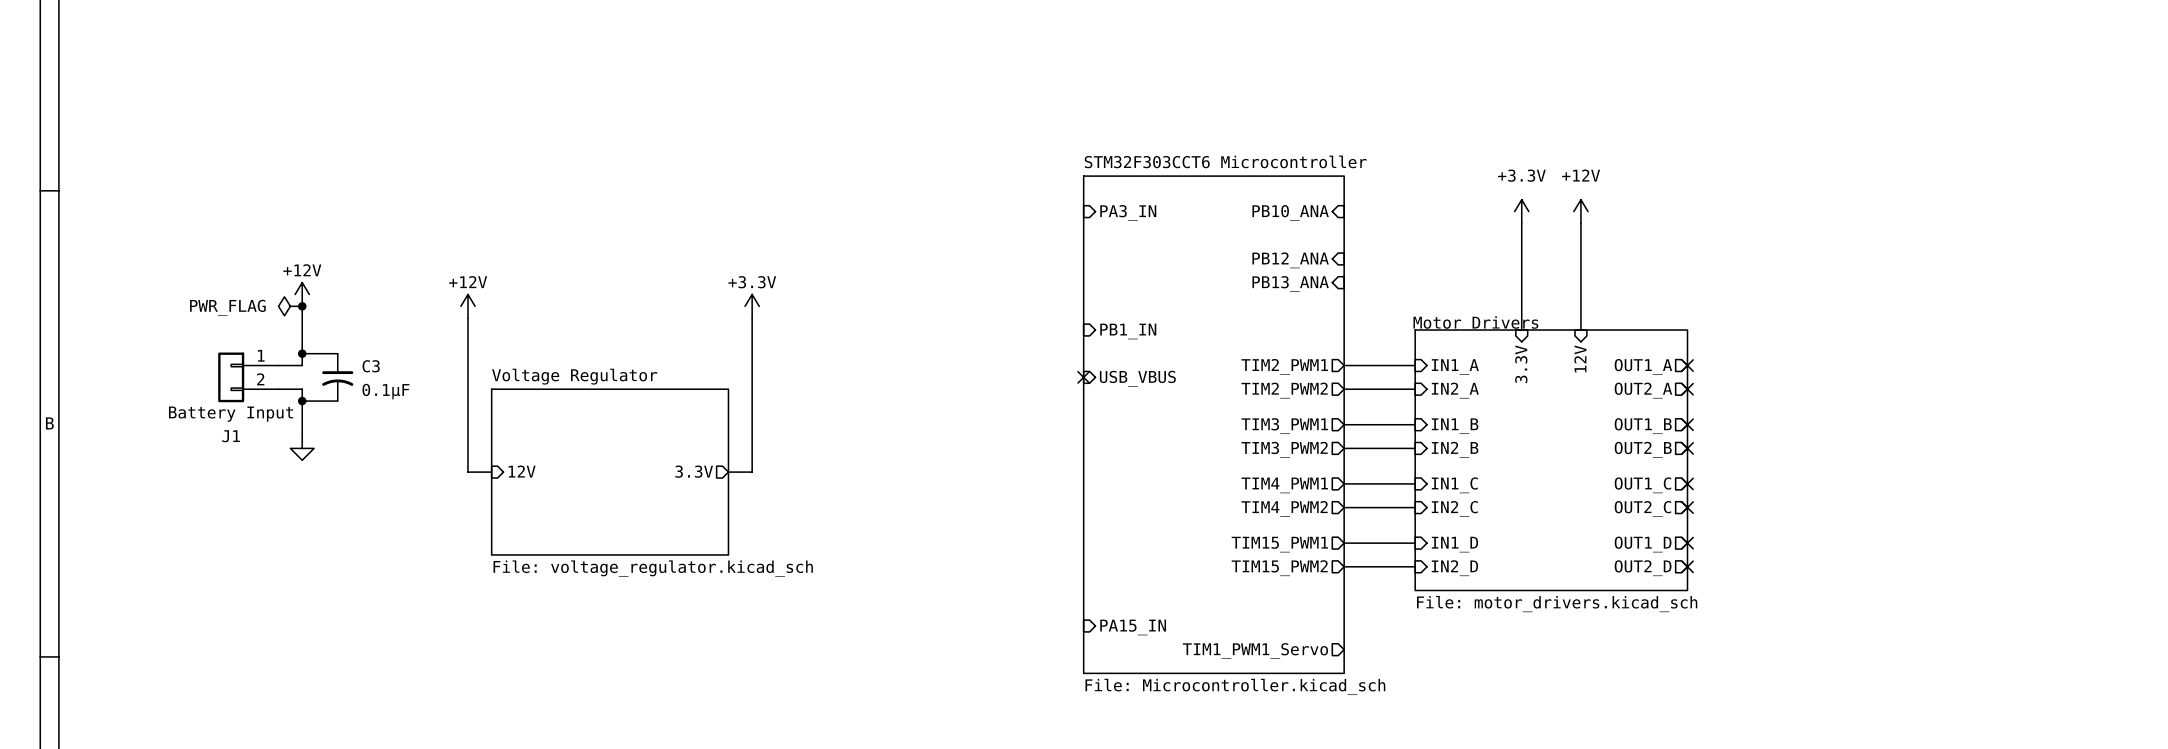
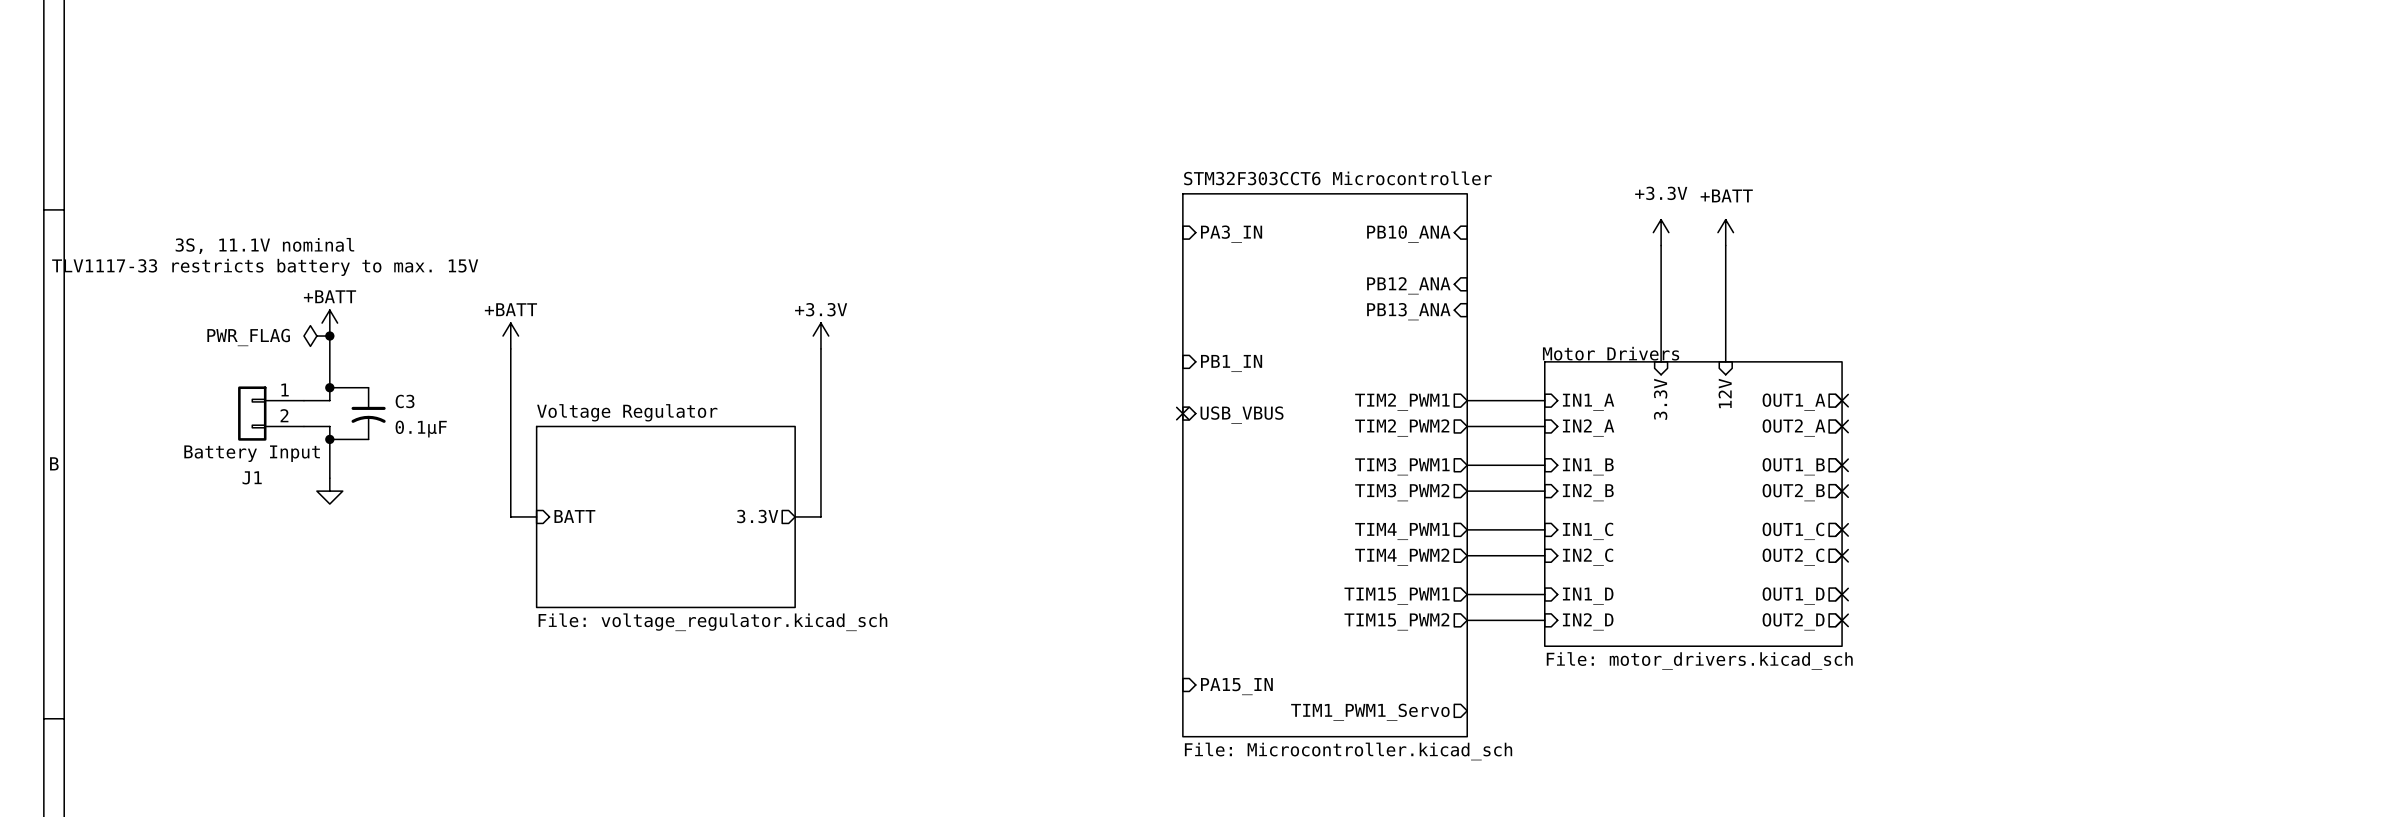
power symbol: +12V (1580, 211) -> +BATT (1725, 232)
text: none -> 3S, 11.1V nominal (264, 245)
text: none -> TLV1117-33 restricts battery to max. 15V (265, 267)
power symbol: +12V (302, 294) -> +BATT (329, 323)
power symbol: +12V (467, 306) -> +BATT (510, 336)
sheet pin: 12V (522, 471) -> BATT (574, 516)

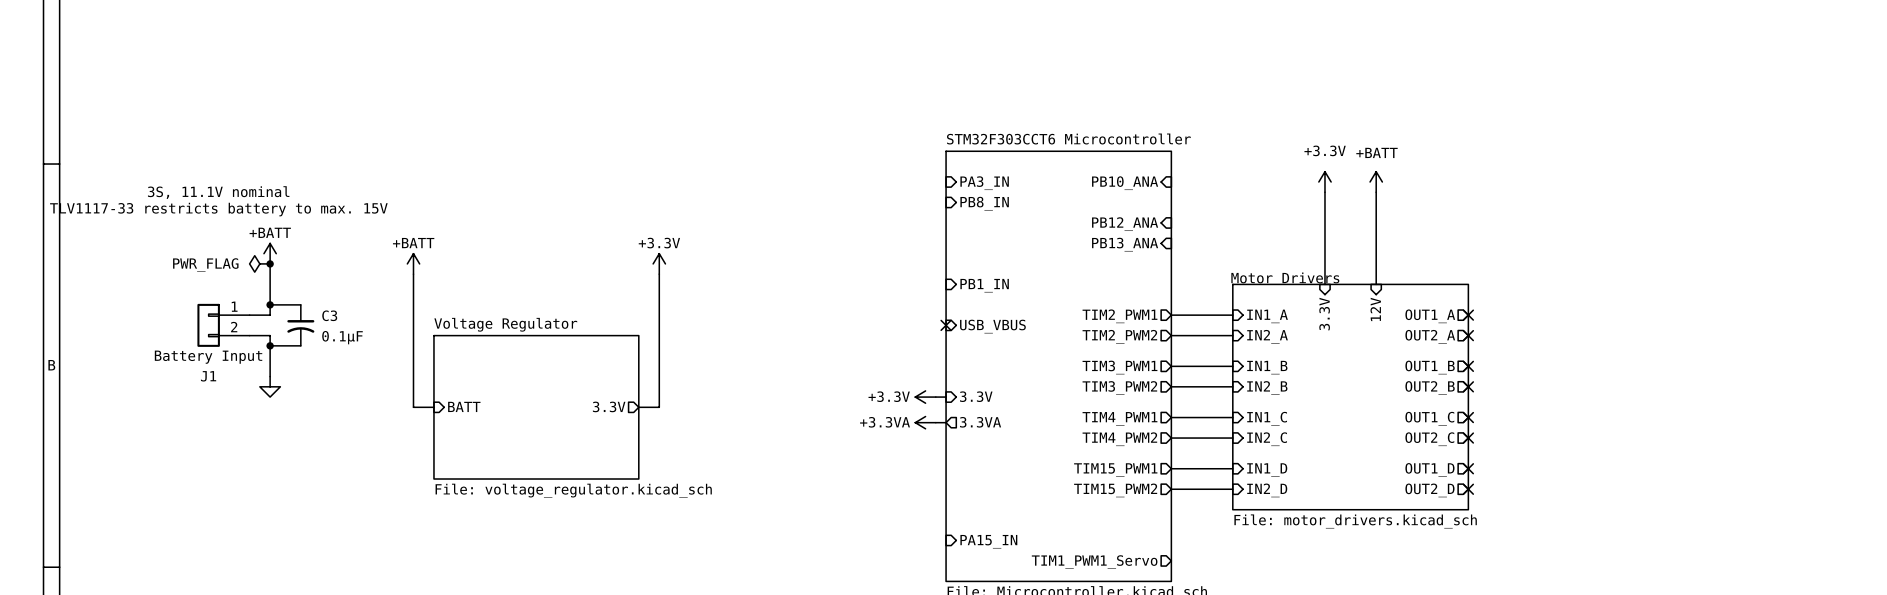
sheet pin: none -> PB8_IN (984, 203)
sheet pin: none -> 3.3V (976, 396)
power symbol: none -> +3.3V (925, 397)
wire: none -> (935, 397) (946, 397)
sheet pin: none -> 3.3VA (980, 422)
power symbol: none -> +3.3VA (925, 422)
wire: none -> (935, 422) (946, 422)

